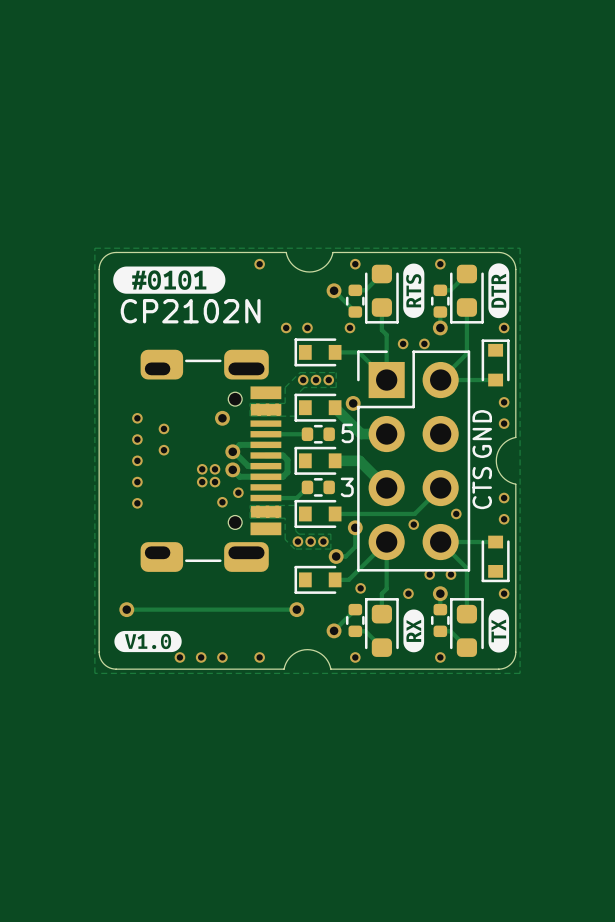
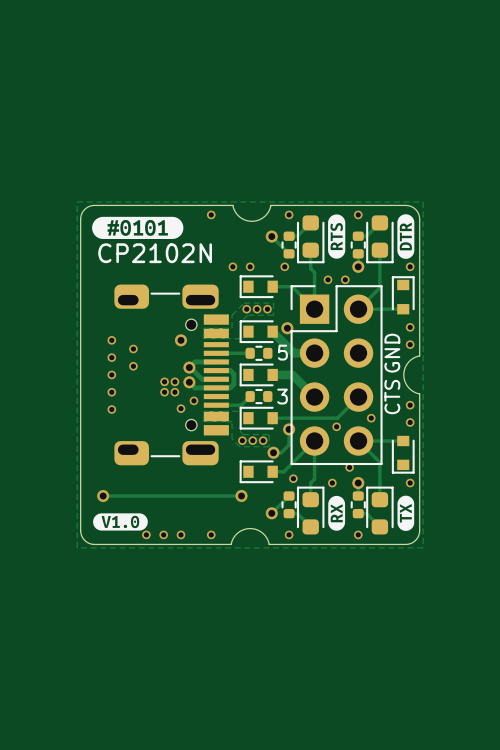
via: (450, 574) -> none

